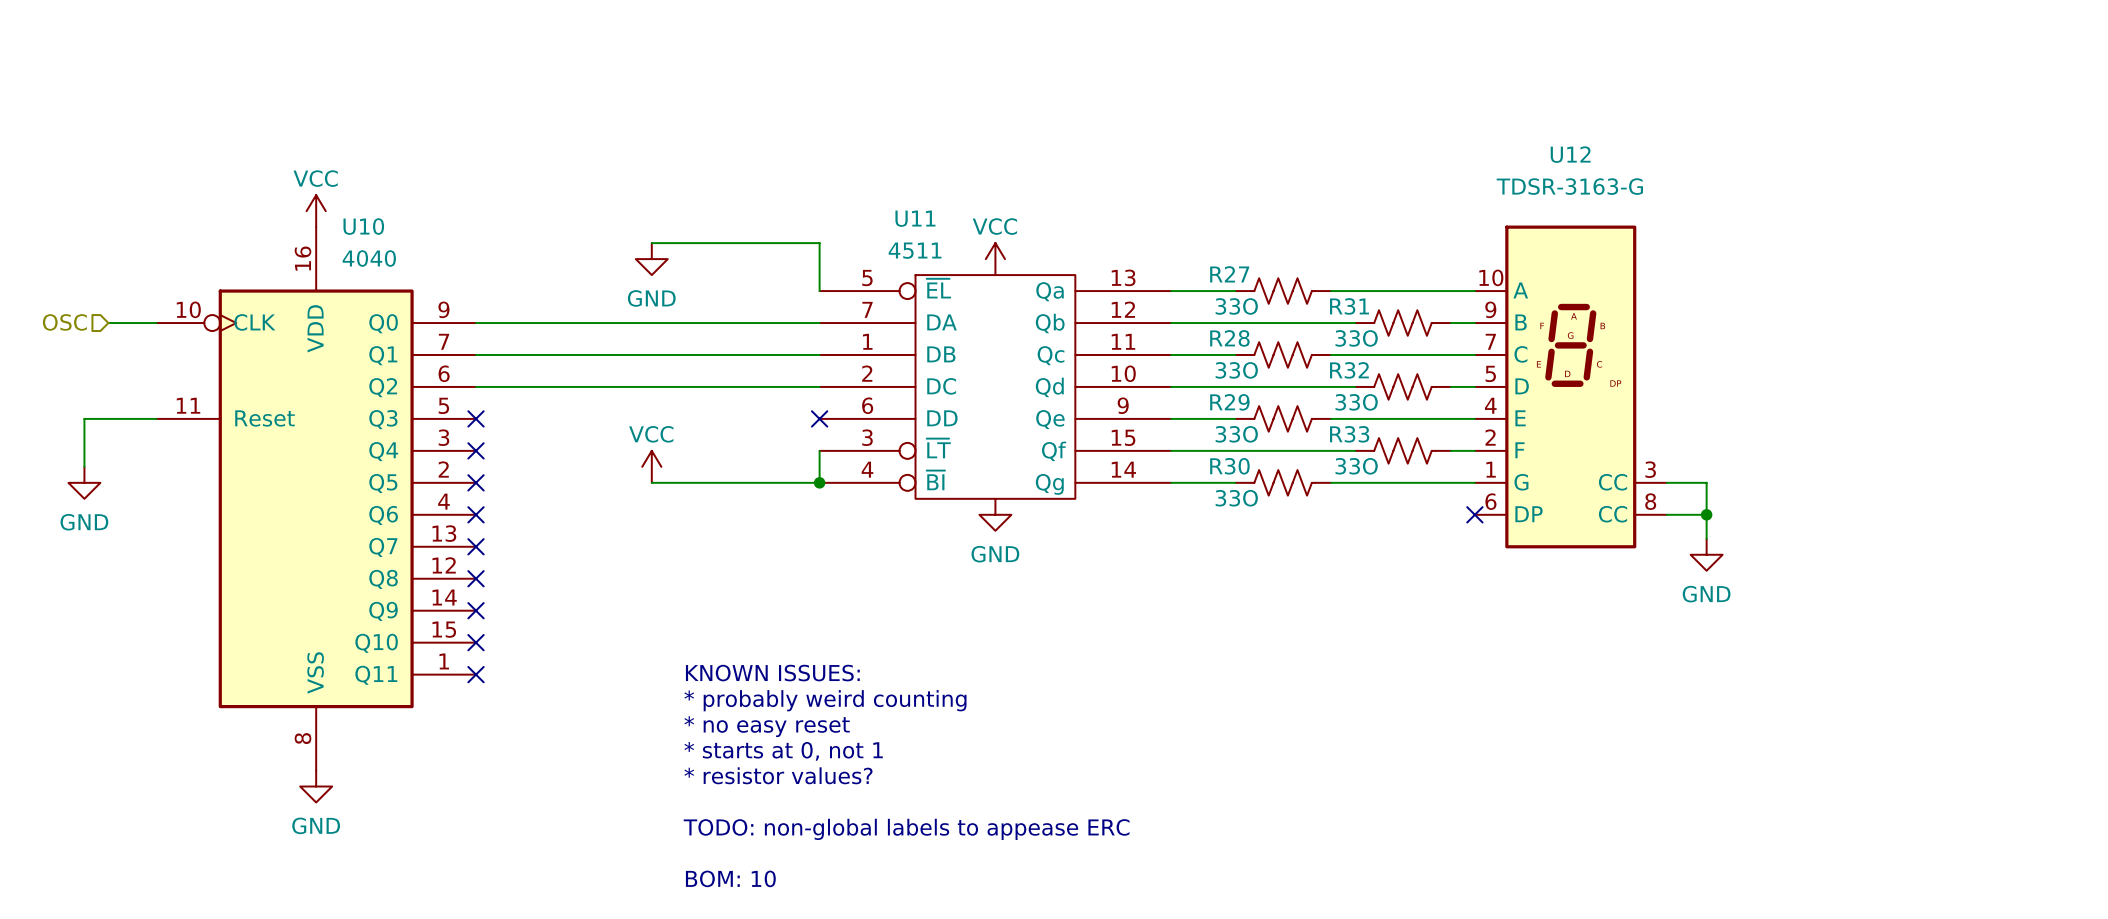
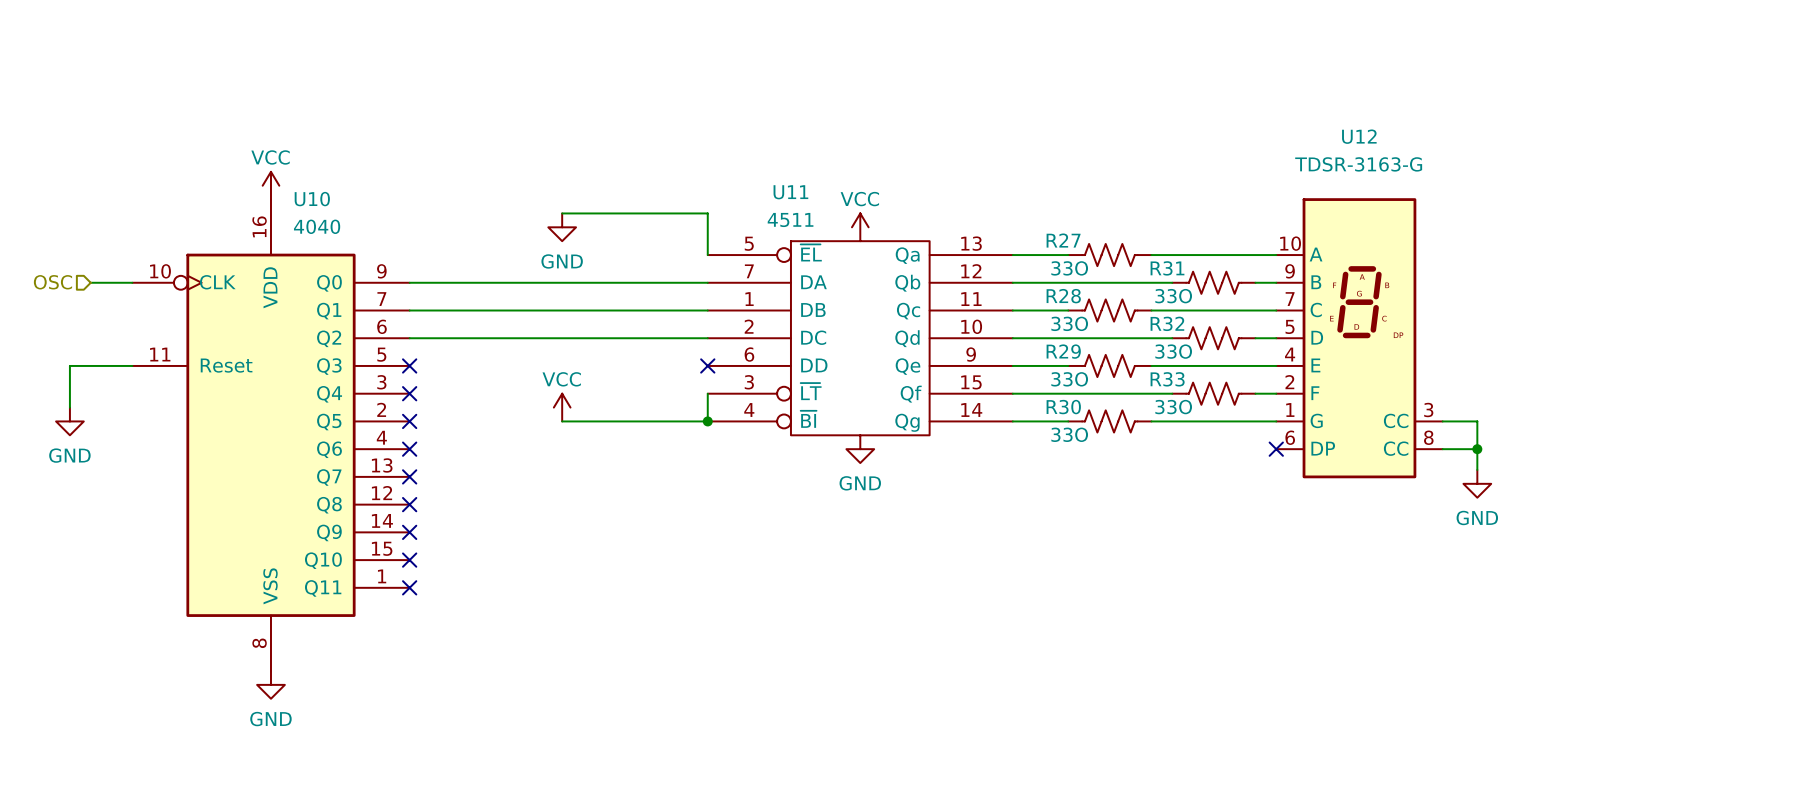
text: KNOWN ISSUES: (772, 673) -> none
text: * probably weird counting (825, 700) -> none
text: * no easy reset (767, 726) -> none
text: * starts at 0, not 1 (783, 751) -> none
text: * resistor values? (778, 775) -> none
text: TODO: non-global labels to appease ERC (906, 829) -> none
text: BOM: 10 (730, 878) -> none

